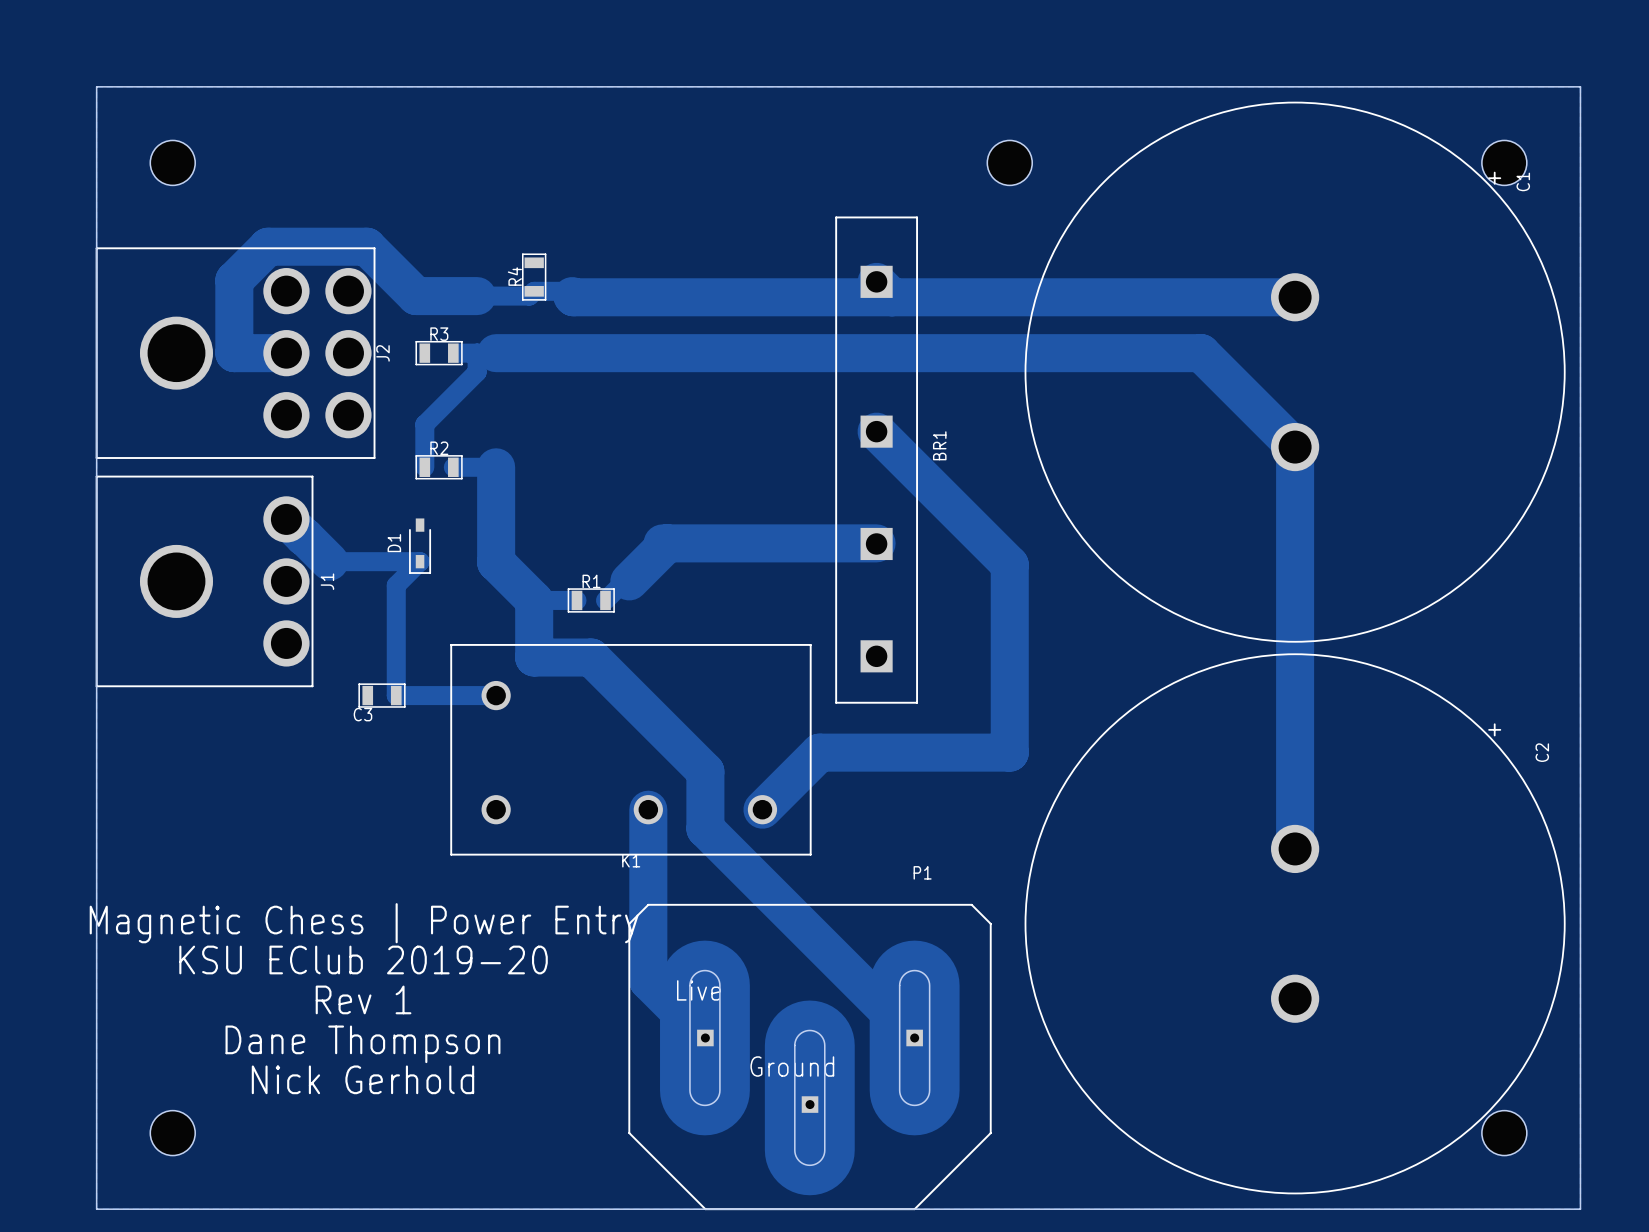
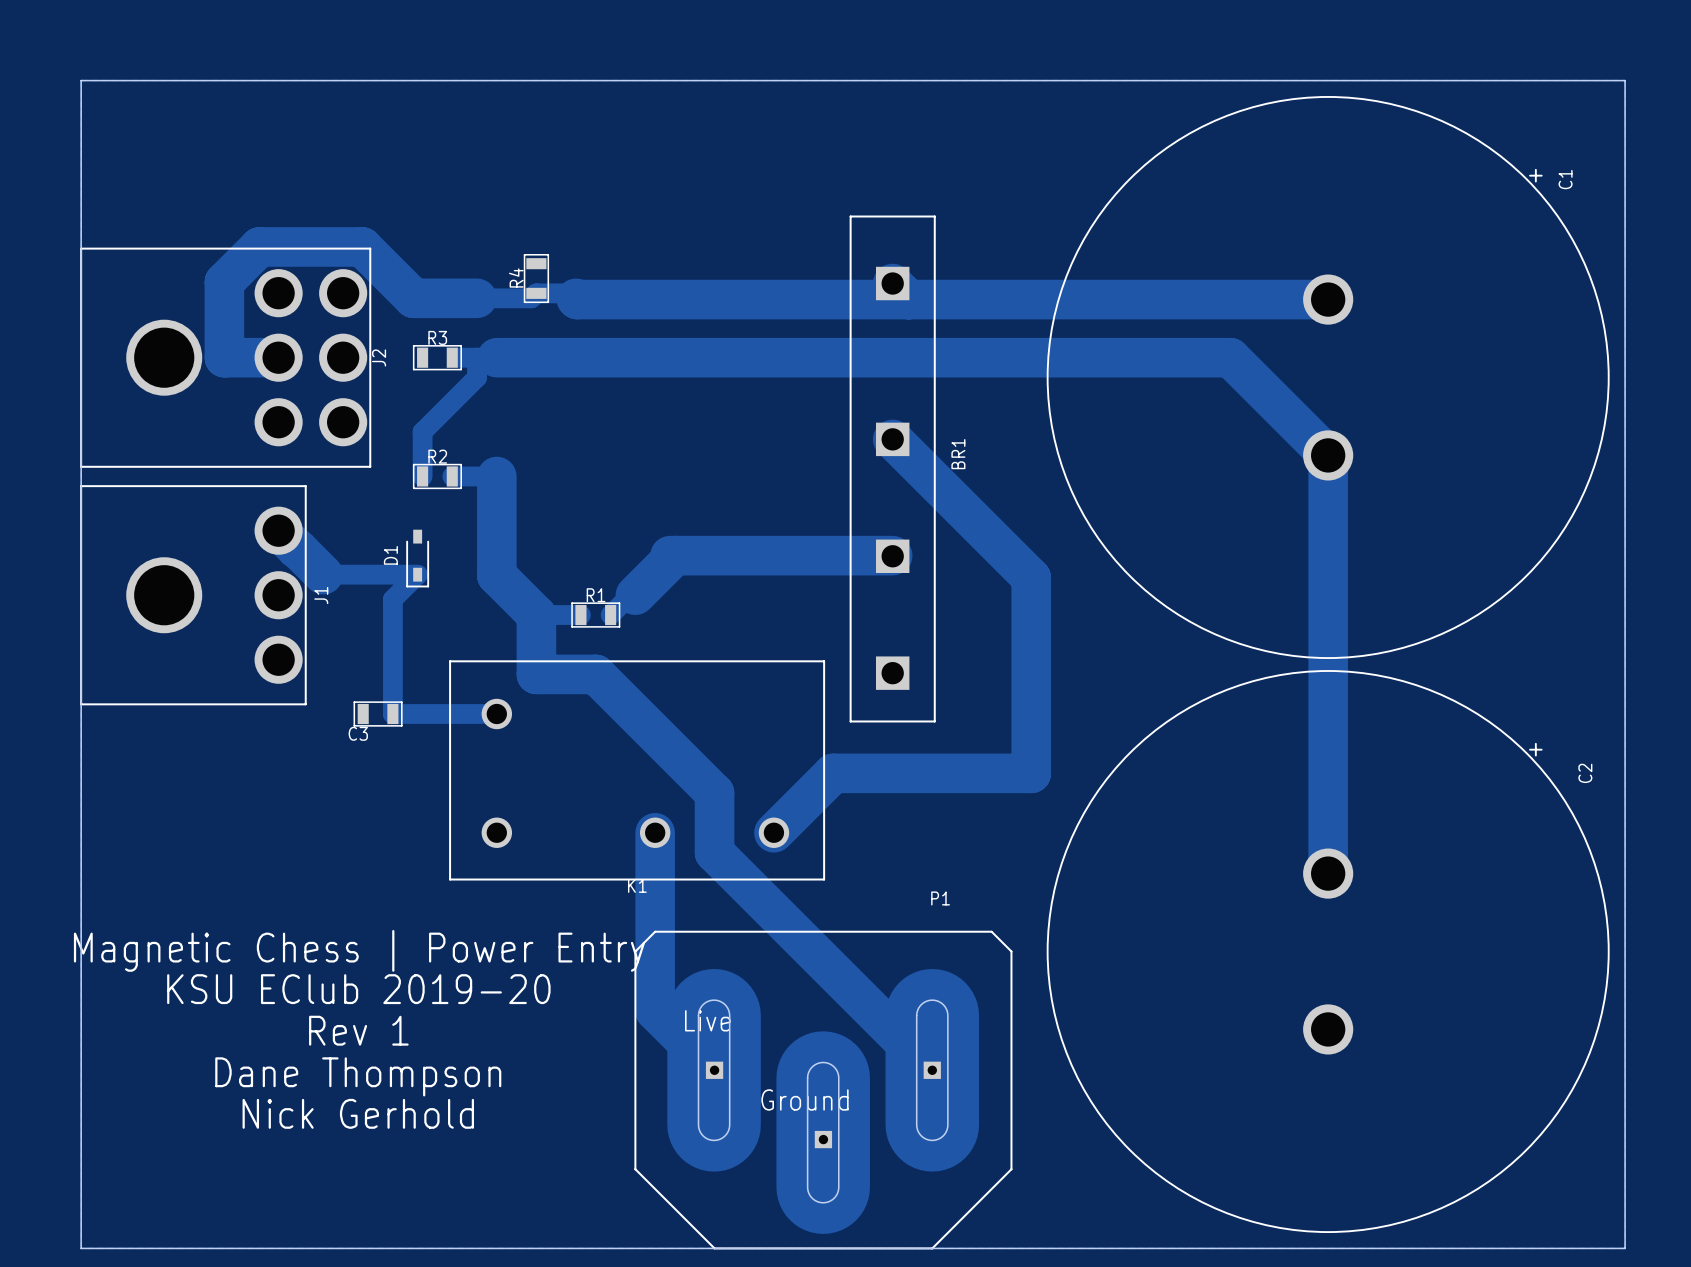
hole: (172, 162) -> none
hole: (1009, 162) -> none
hole: (1504, 162) -> none
hole: (172, 1133) -> none
hole: (1504, 1133) -> none

